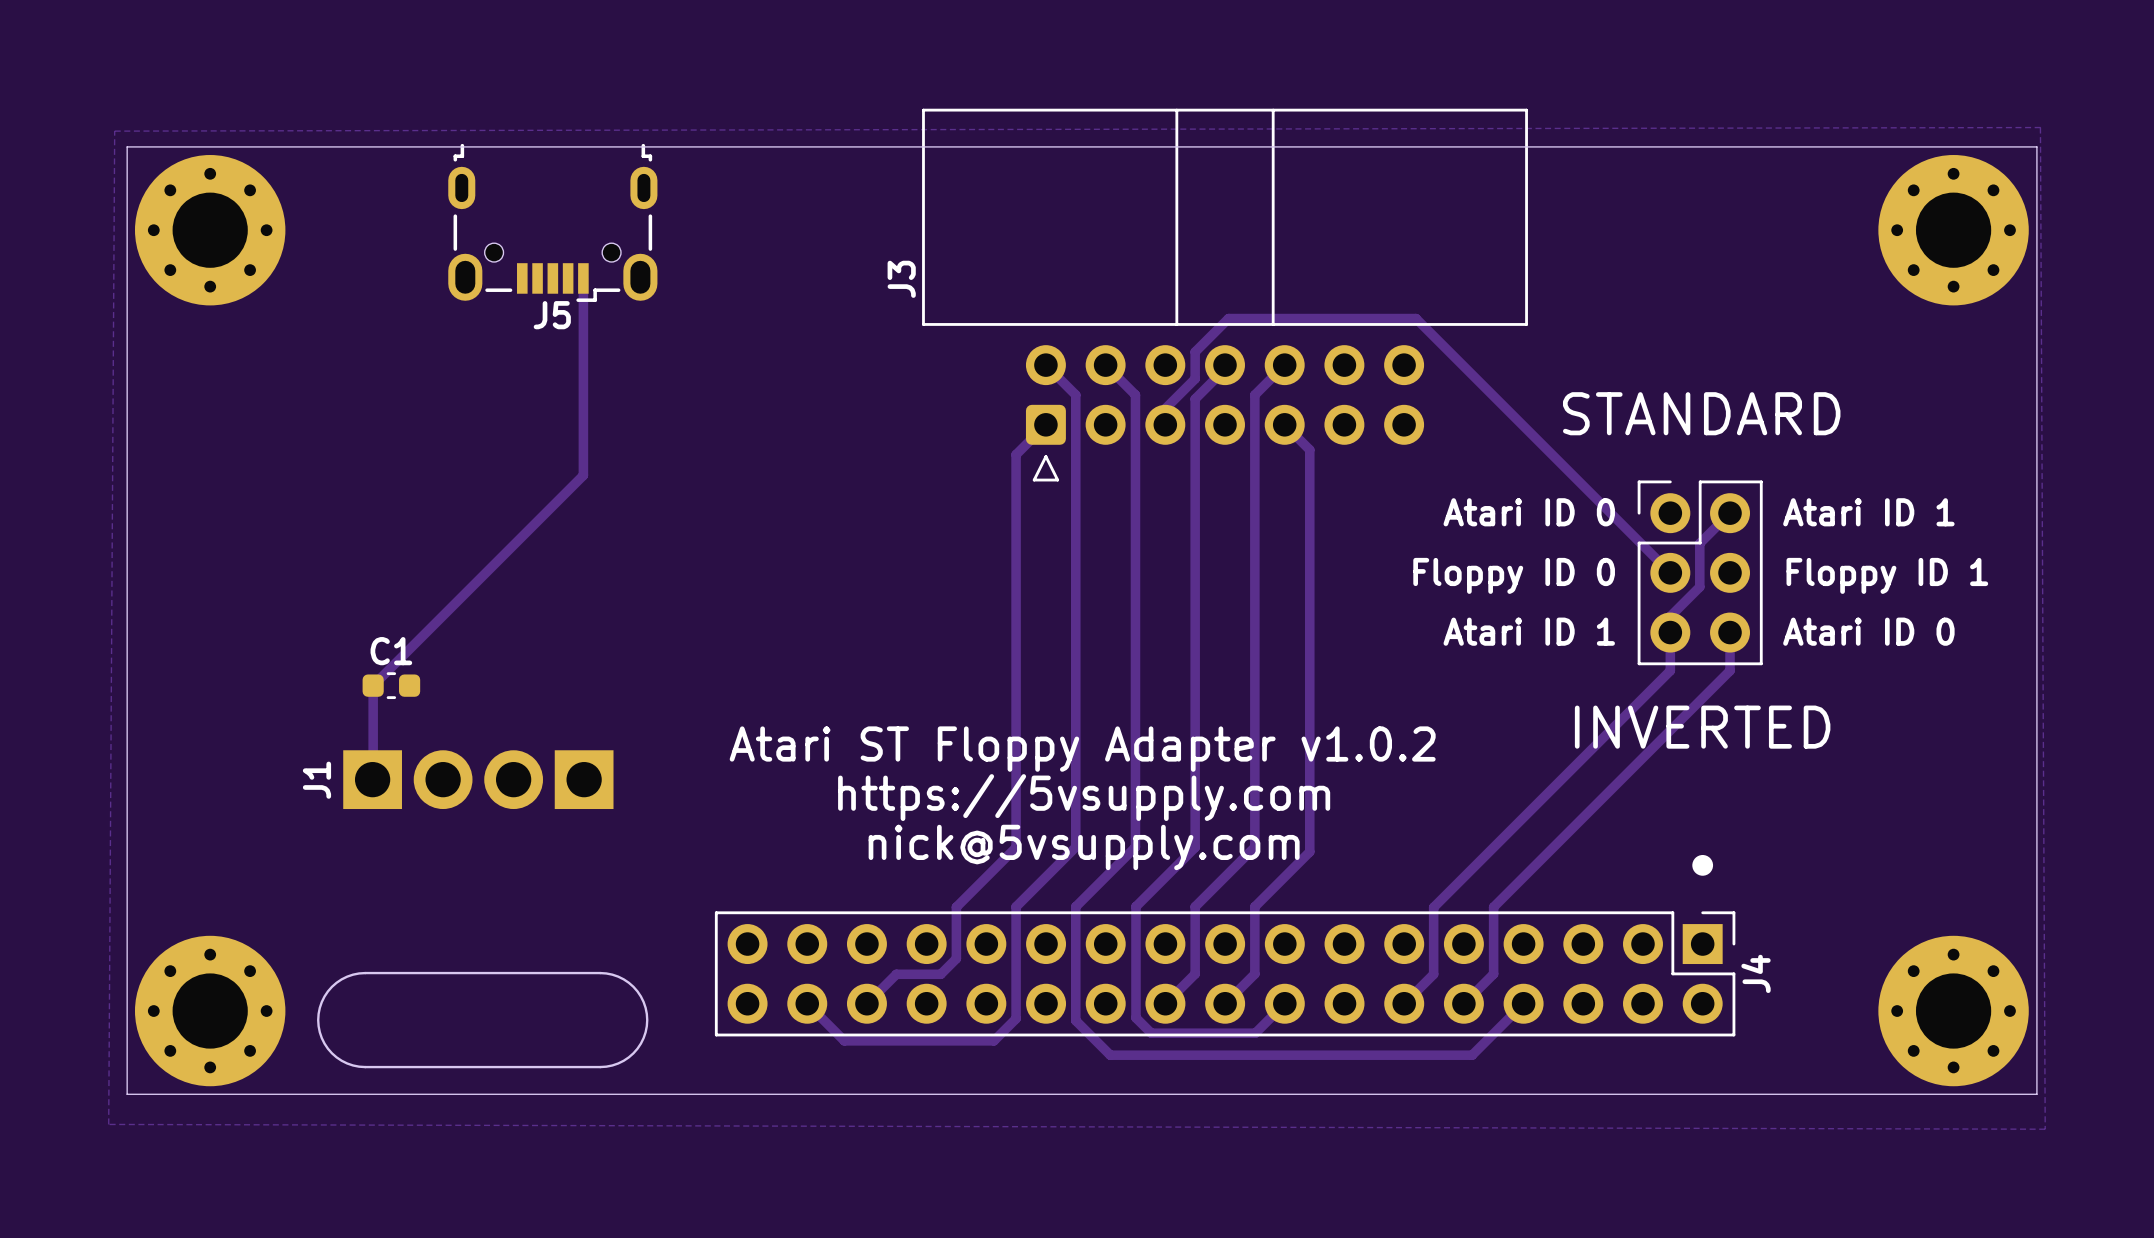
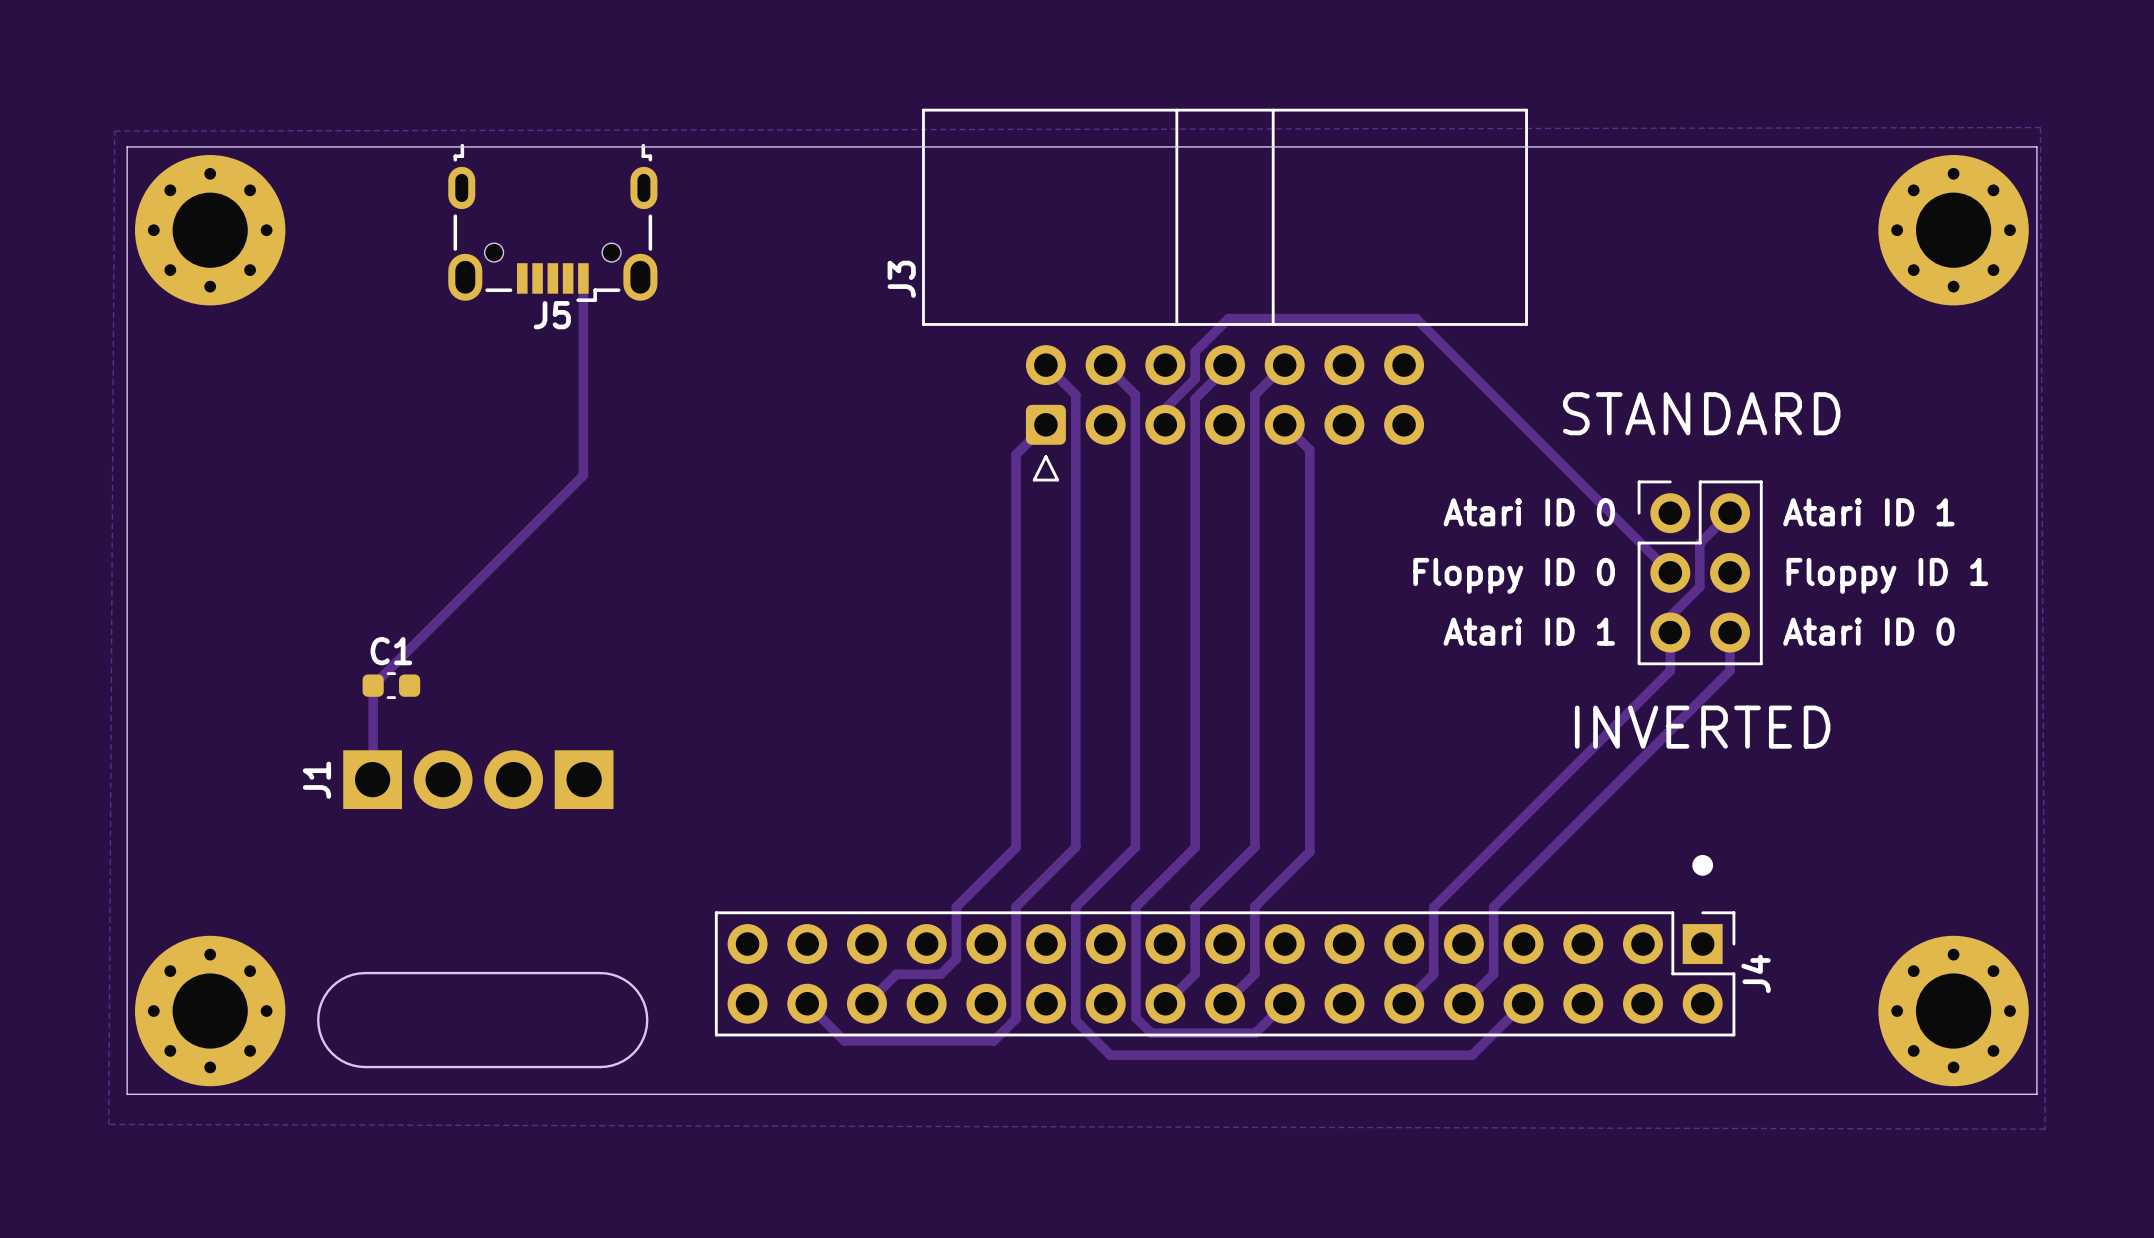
text: Atari ST Floppy Adapter v1.0.2 (1082, 749) -> none
text: https://5vsupply.com (1084, 797) -> none
text: nick@5vsupply.com (1084, 847) -> none

